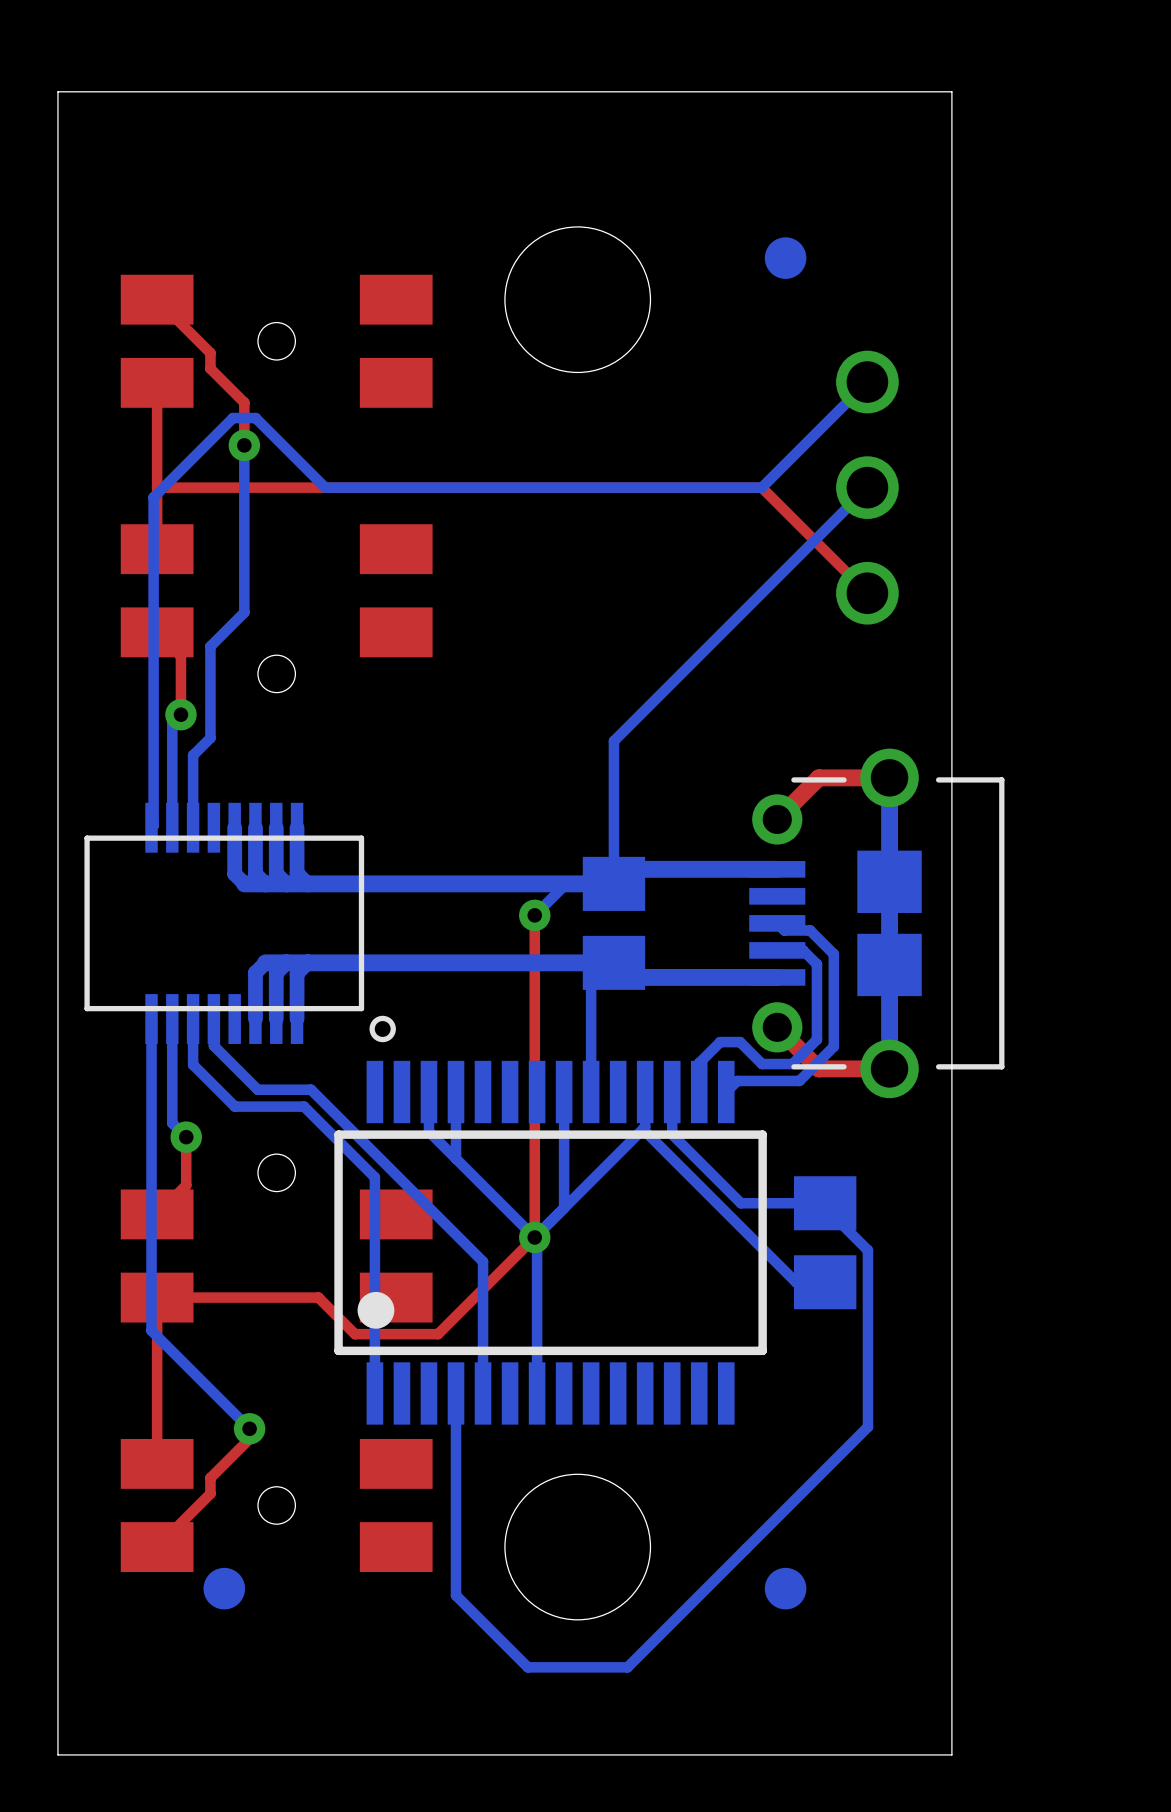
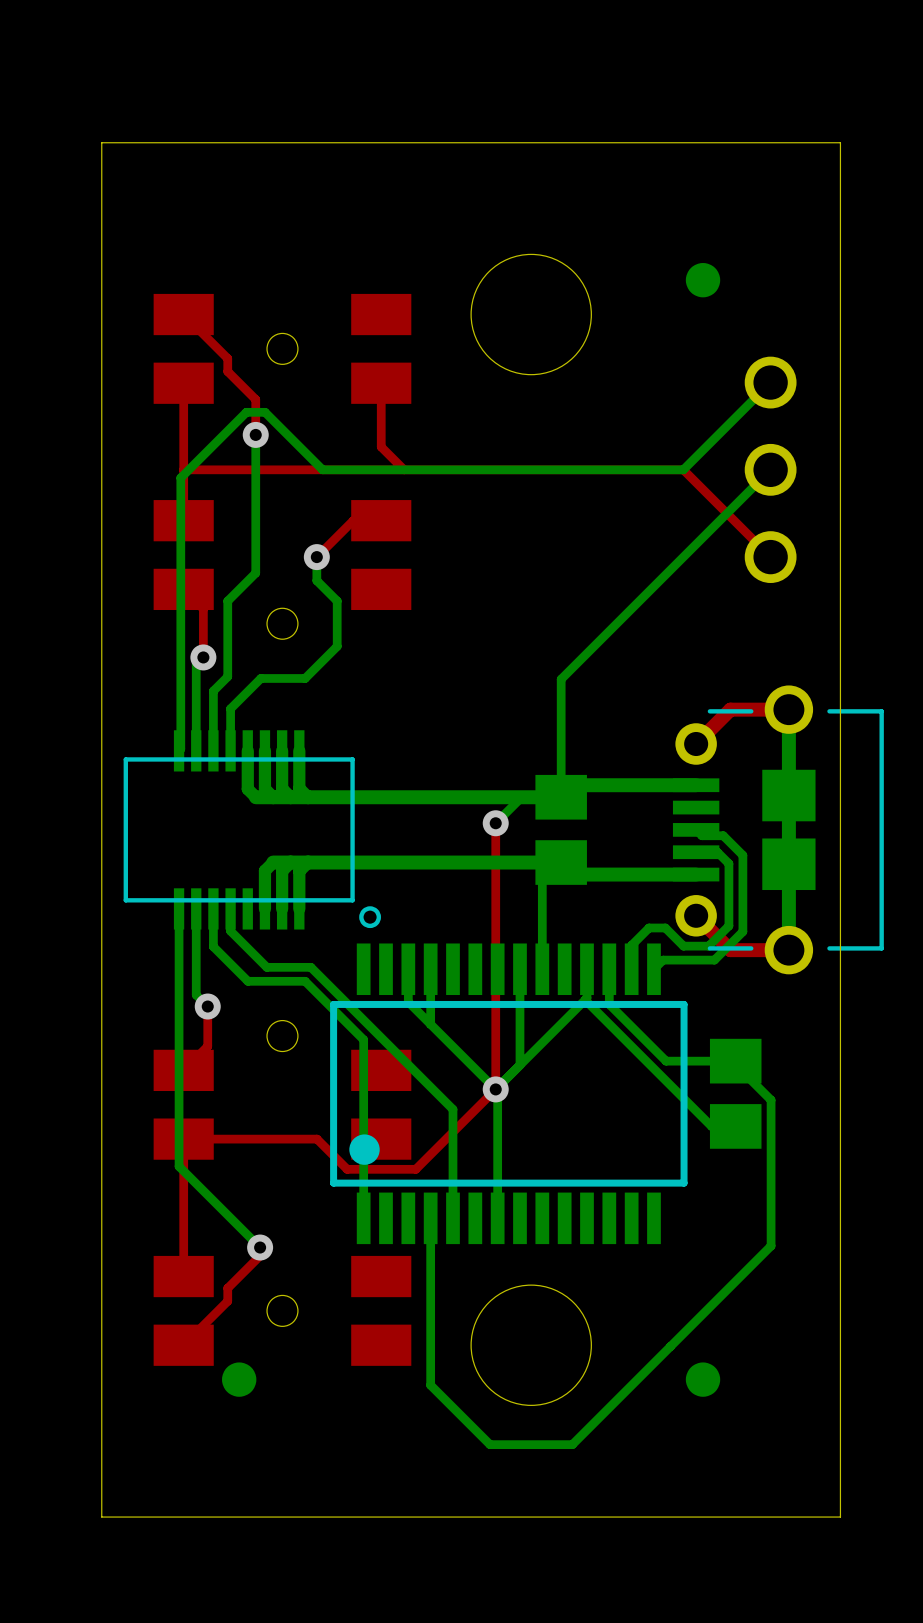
top track: none -> (381, 383) (381, 446) (404, 469)
top track: none -> (381, 520) (353, 520) (316, 557)
bottom track: none -> (316, 557) (316, 580) (337, 601) (337, 646) (305, 678) (260, 678) (230, 708) (230, 750)
via: none -> (316, 557)

